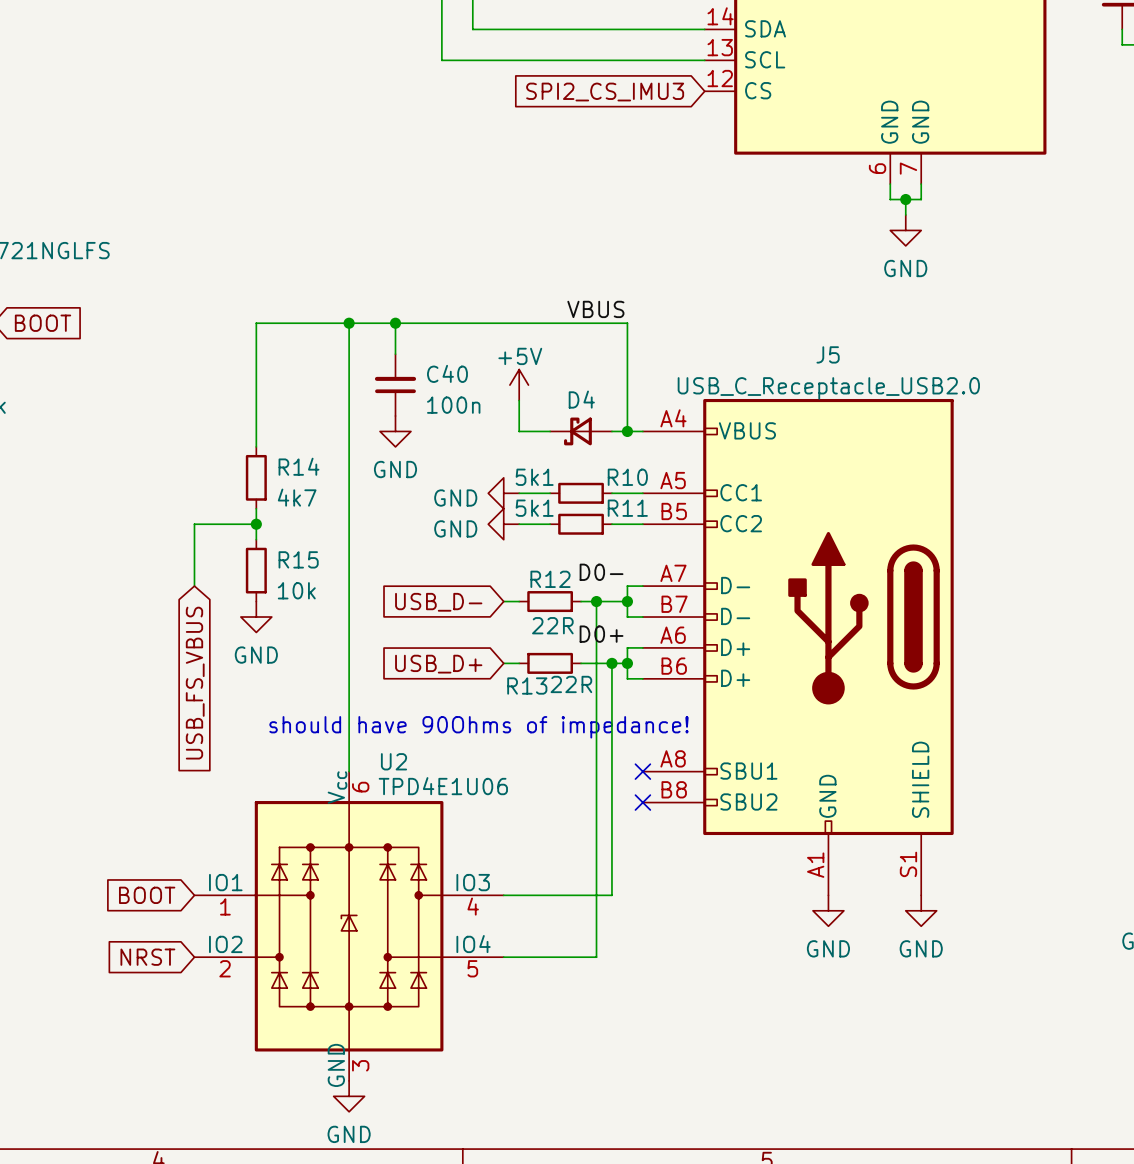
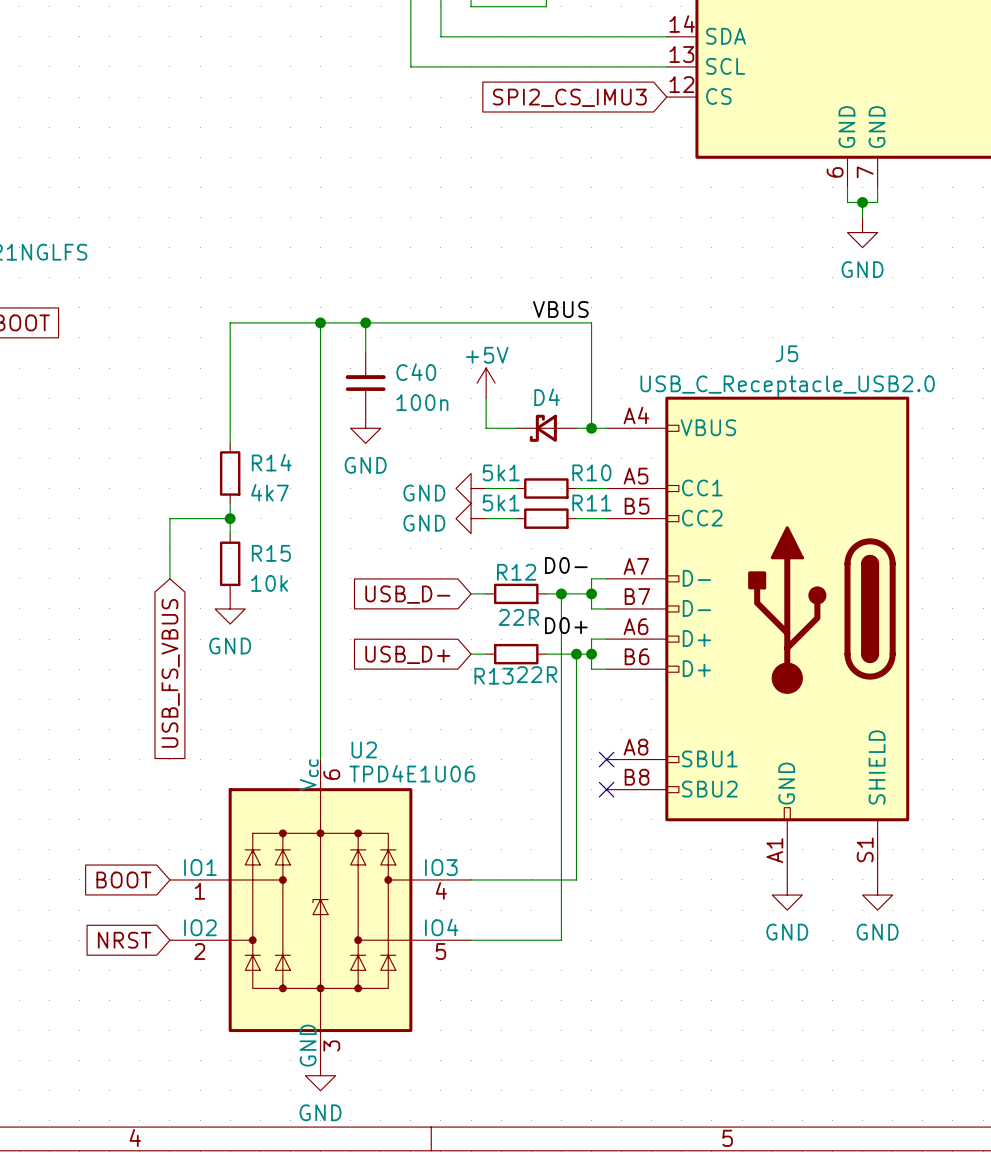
text: should have 90Ohms of impedance! (478, 727) -> none

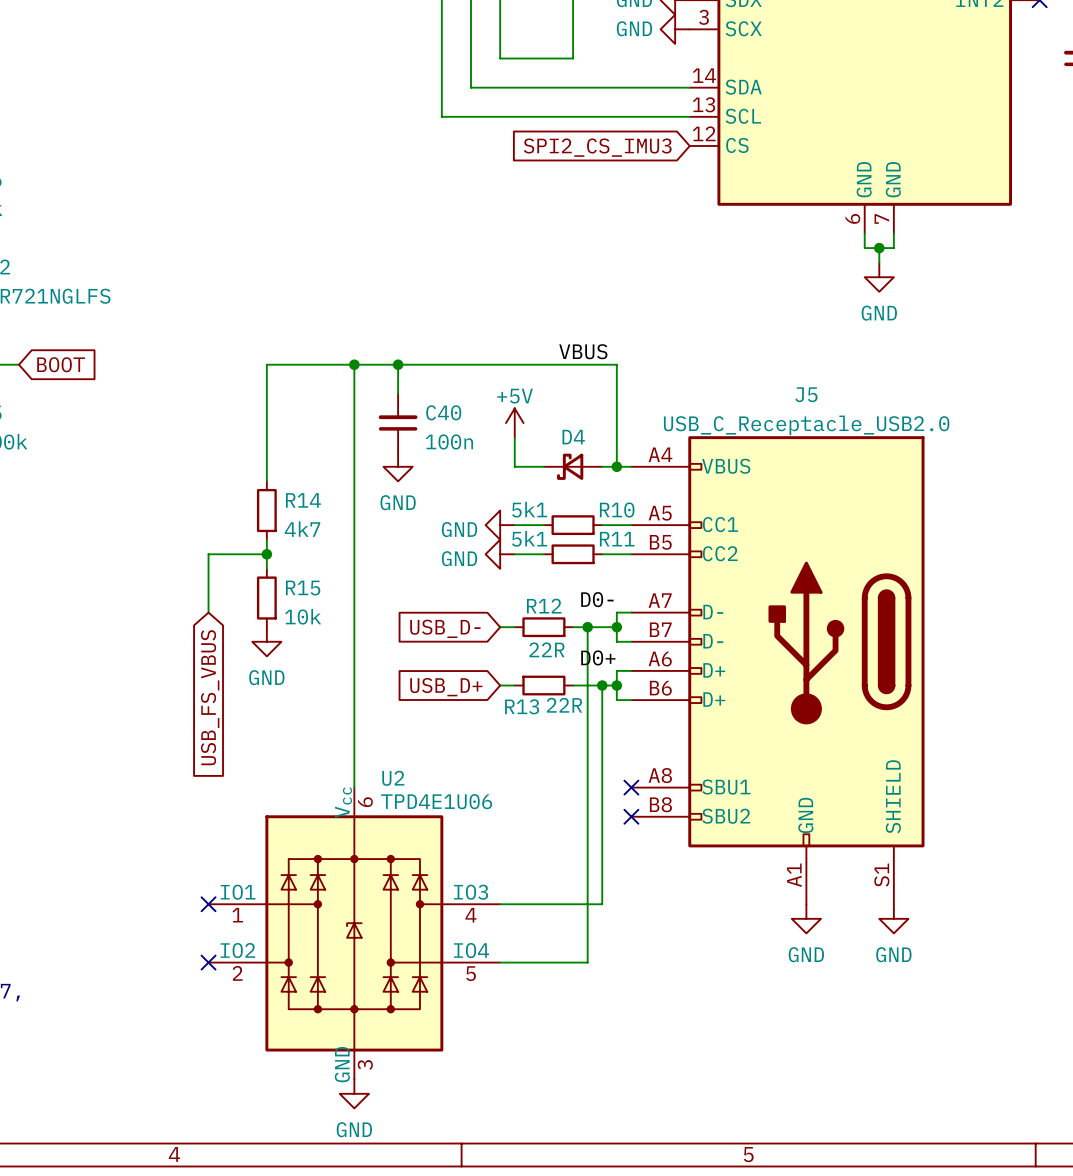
global label: BOOT (123, 879) -> none
no-connect mark: none -> (208, 904)
global label: NRST (124, 940) -> none
no-connect mark: none -> (208, 962)

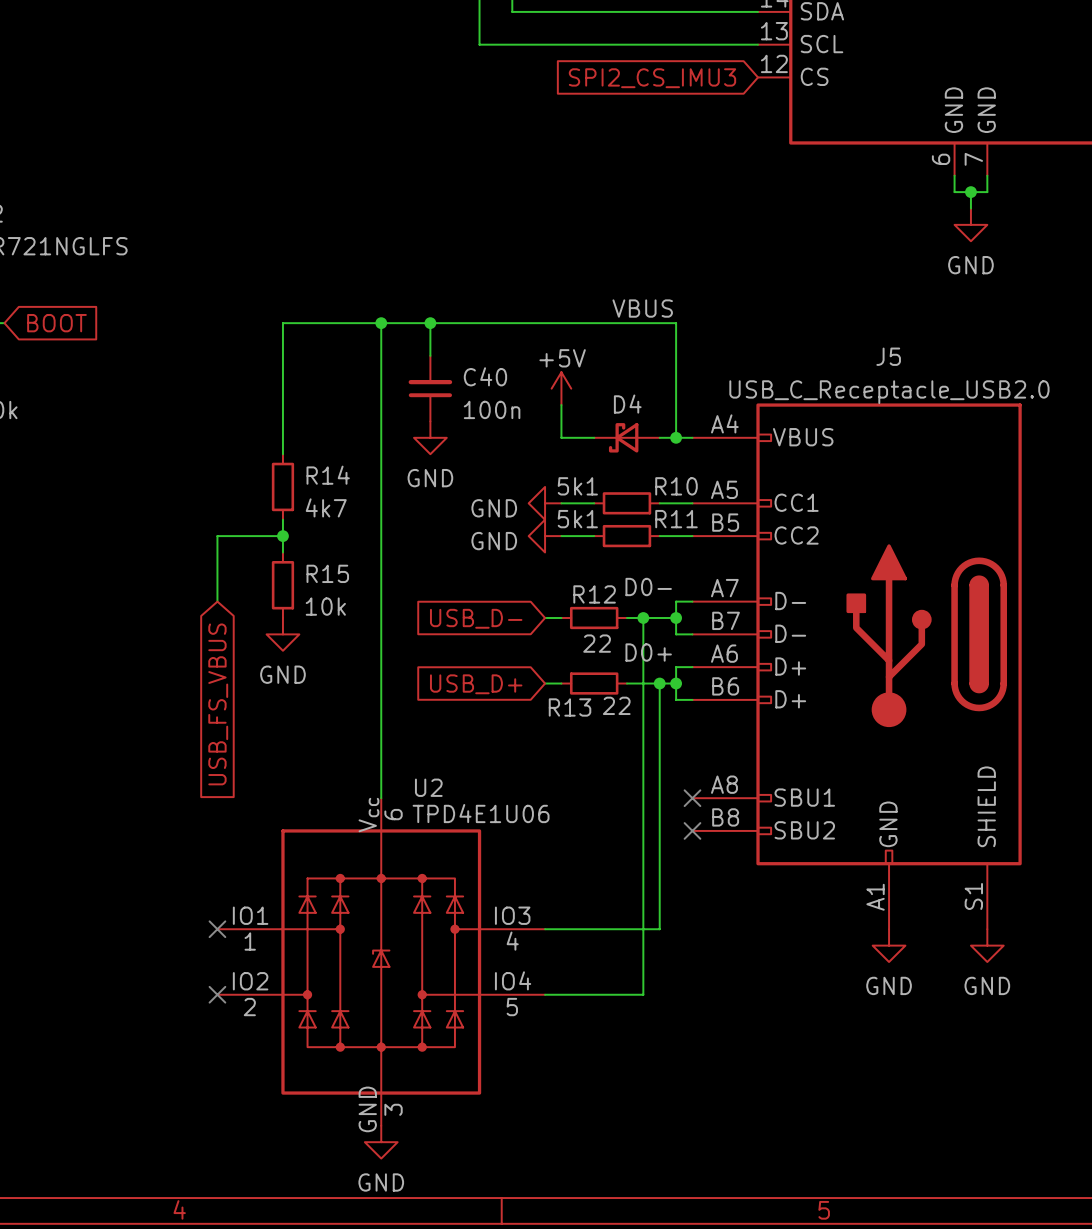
R12 value: 22R (546, 649) -> 22 (597, 643)
R13 value: 22R (564, 705) -> 22 (616, 705)

